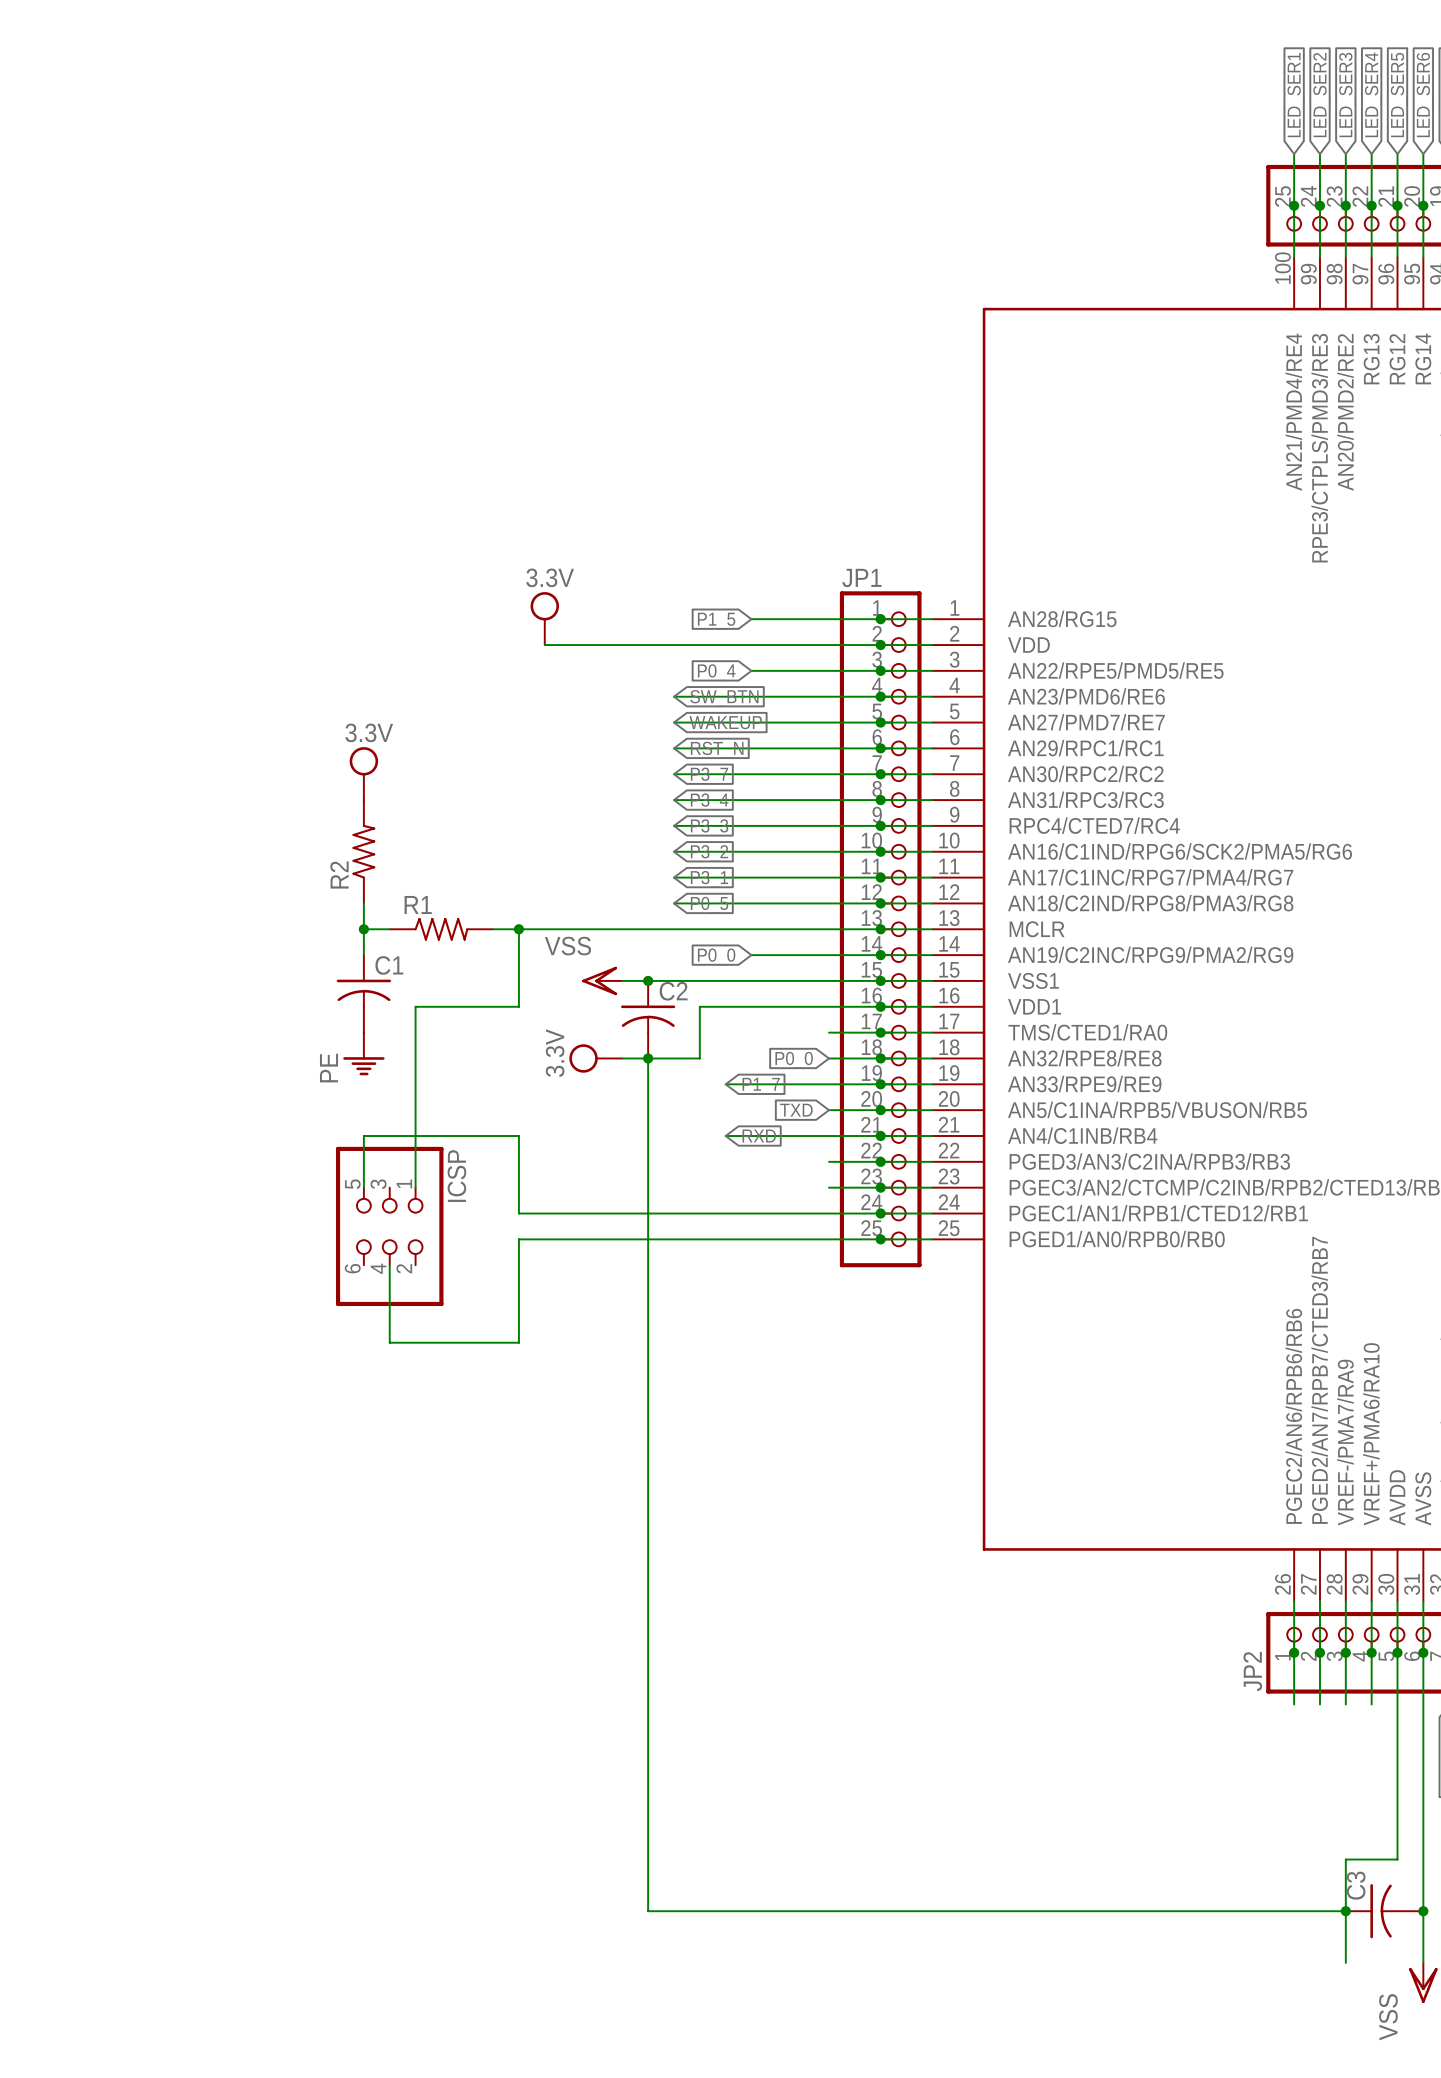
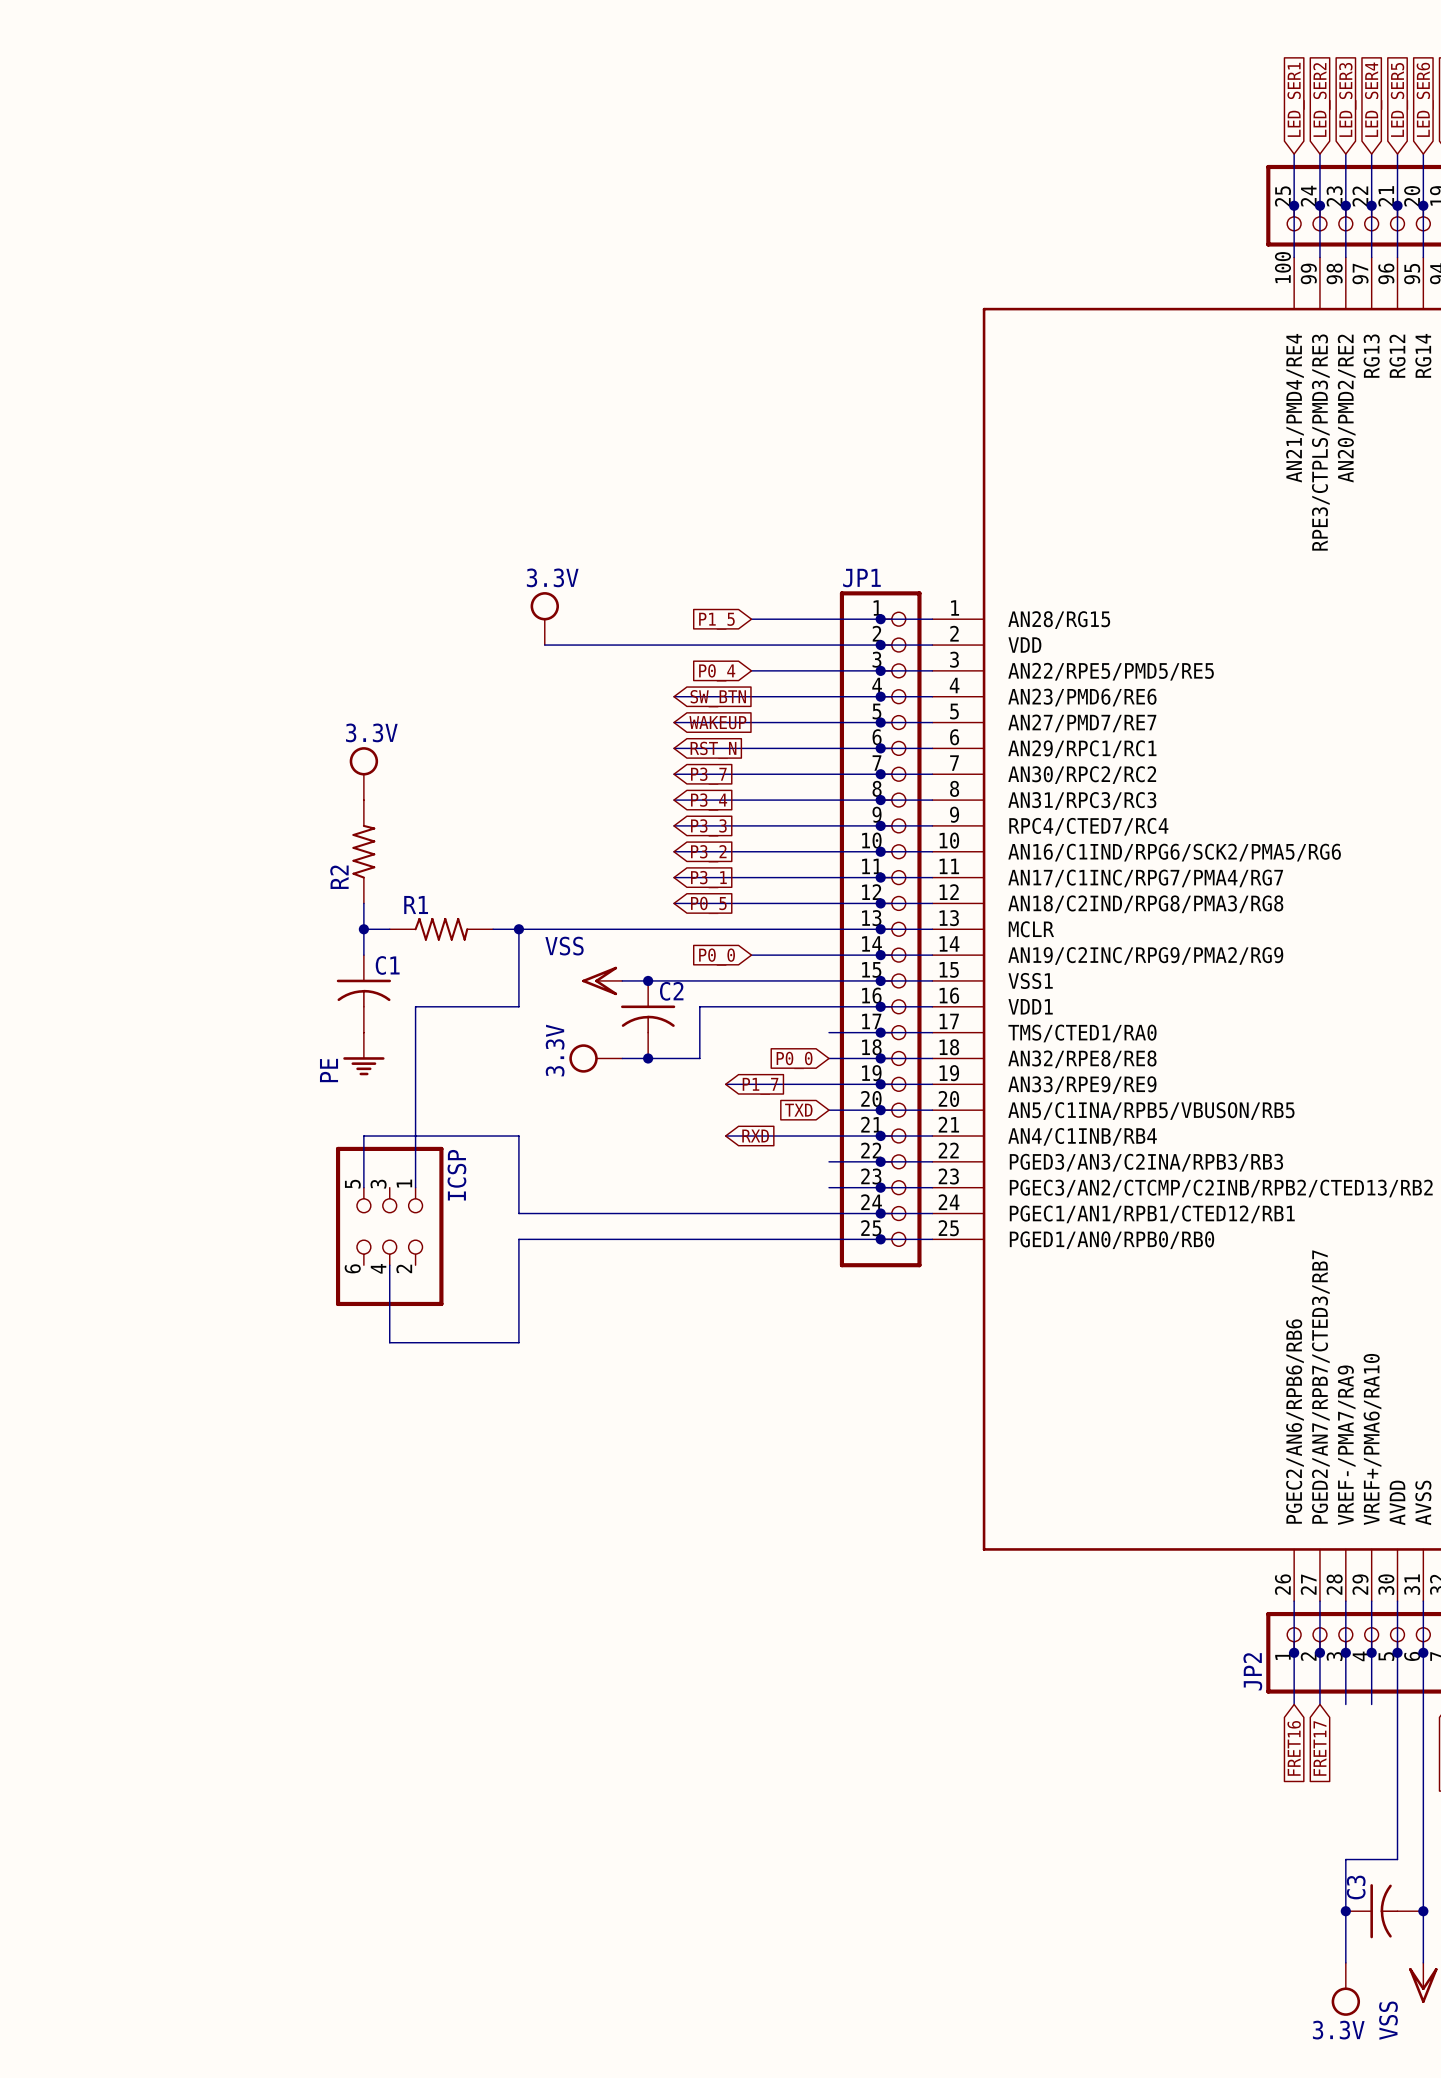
wire: (648, 1058) (648, 1911) (1345, 1911) -> none
global label: none -> FRET16 (1294, 1748)
global label: none -> FRET17 (1319, 1748)
power symbol: none -> 3.3V (1345, 1989)

